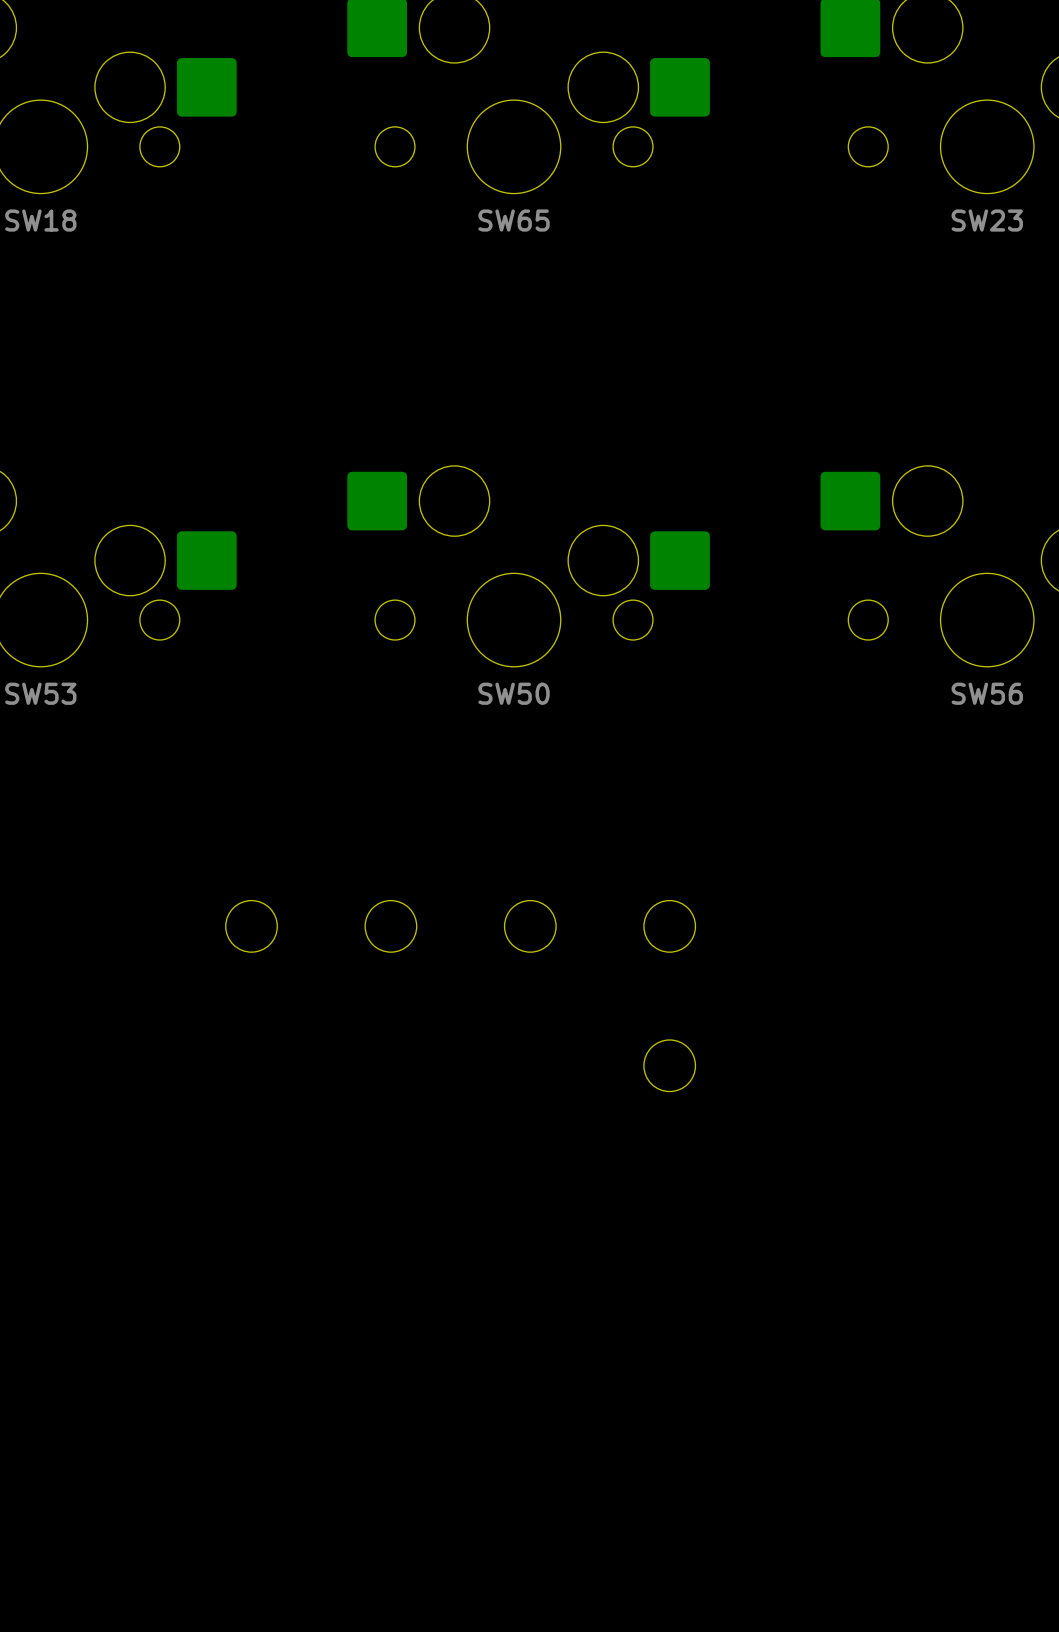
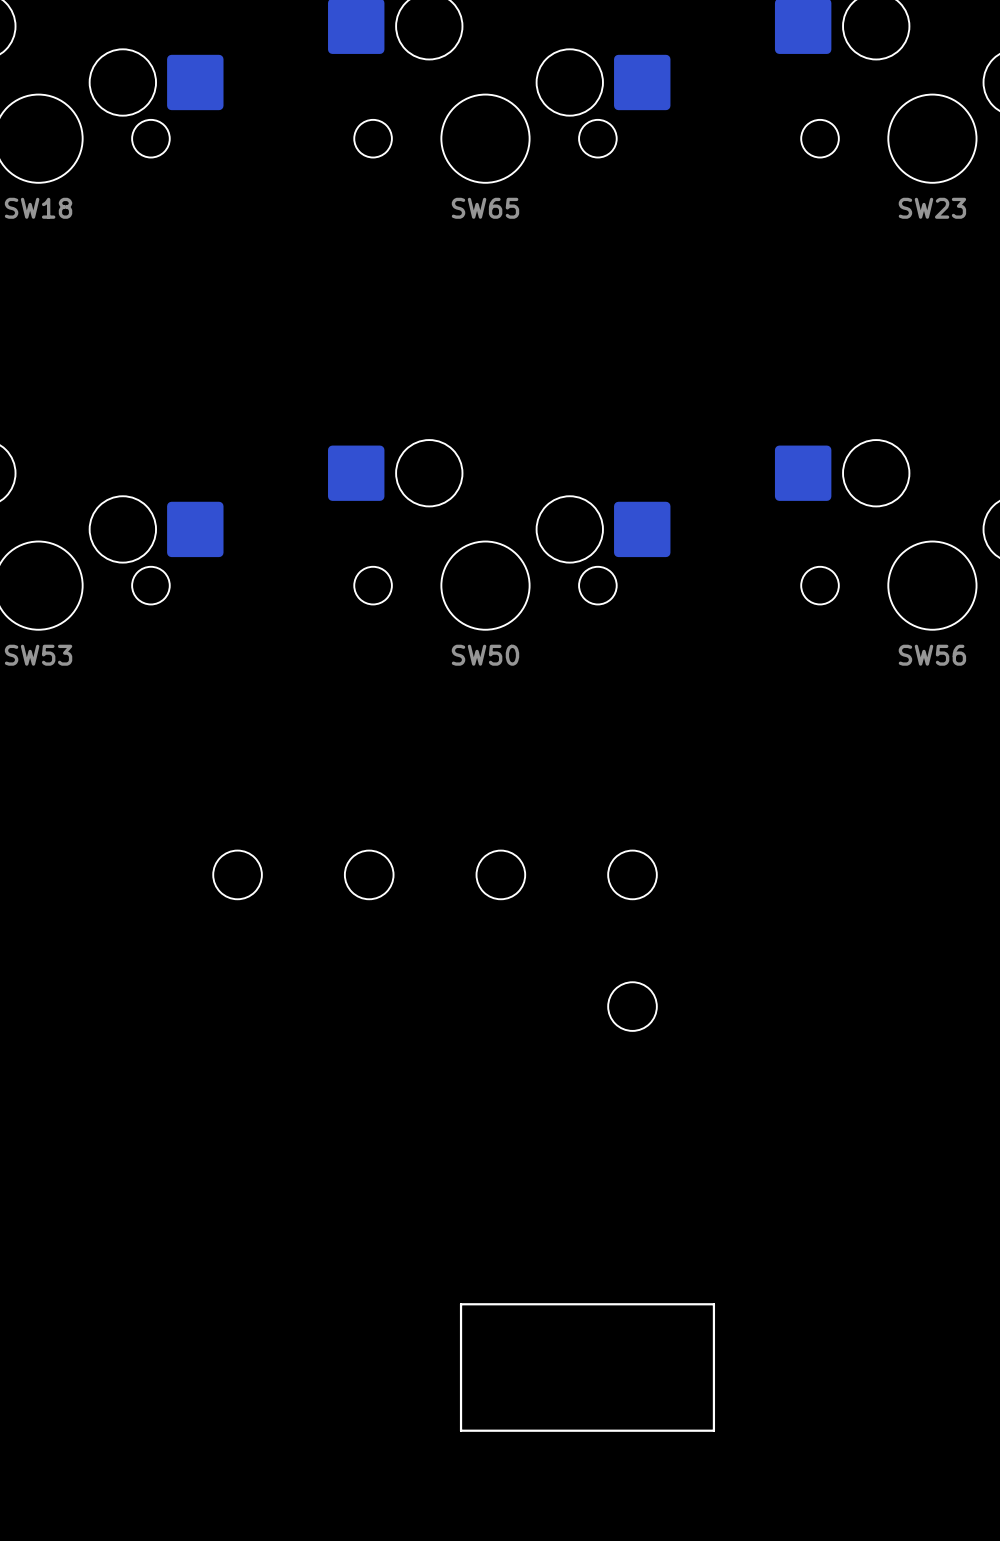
board edge: none -> (713, 1304) (461, 1304) (461, 1430) (713, 1430) (713, 1304)

